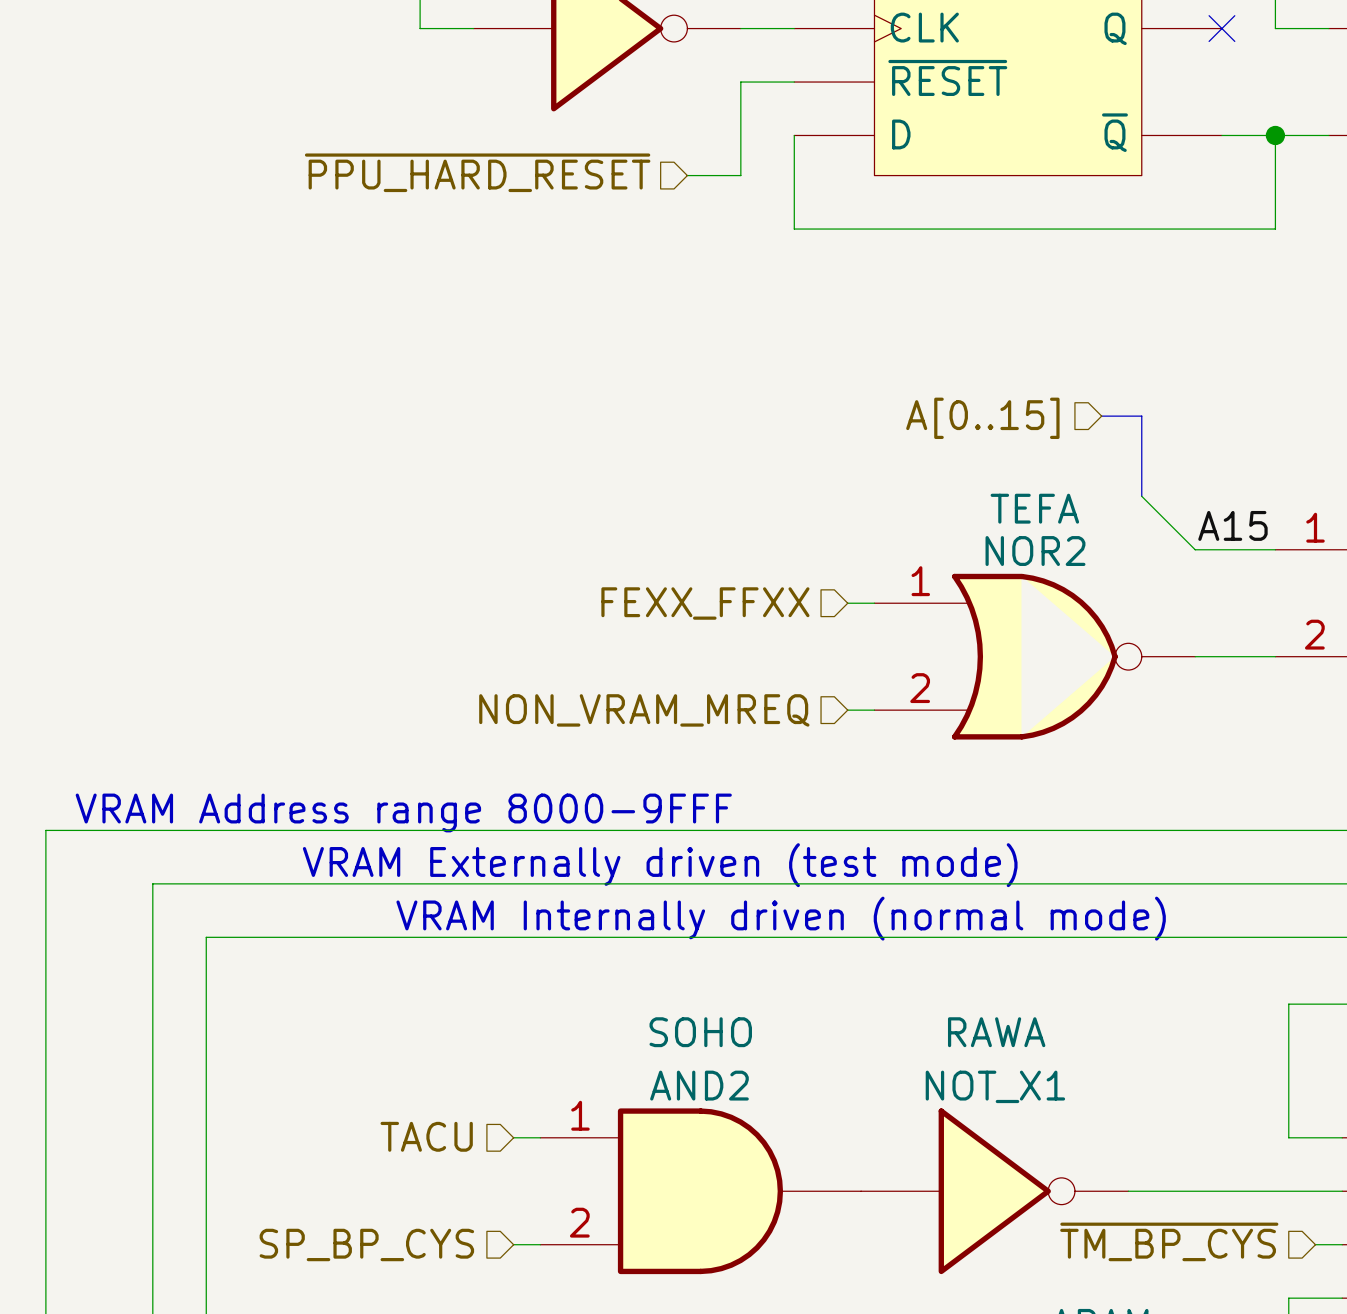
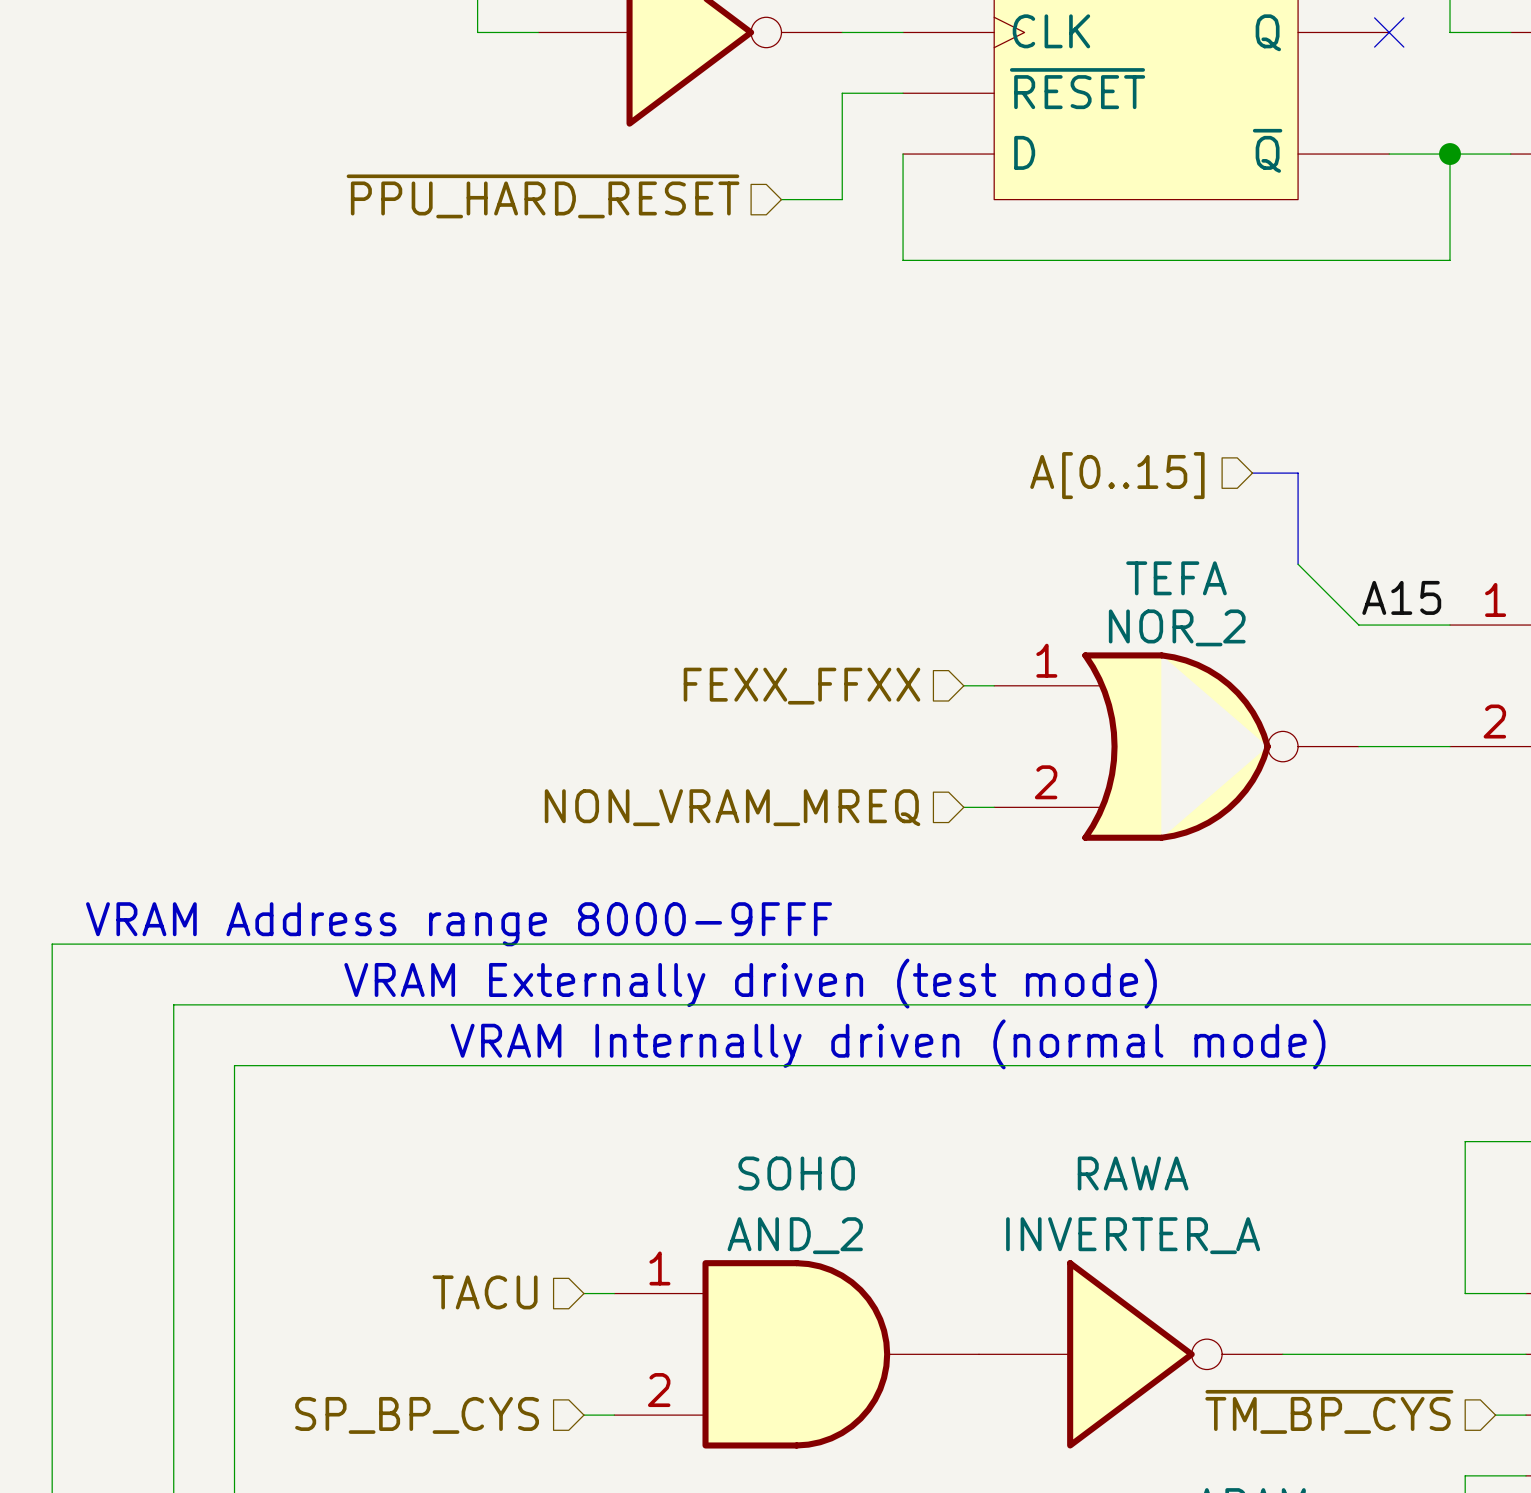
TEFA value: NOR2 (1035, 551) -> NOR_2 (1177, 627)
SOHO value: AND2 (699, 1085) -> AND_2 (795, 1235)
RAWA value: NOT_X1 (995, 1086) -> INVERTER_A (1133, 1235)

